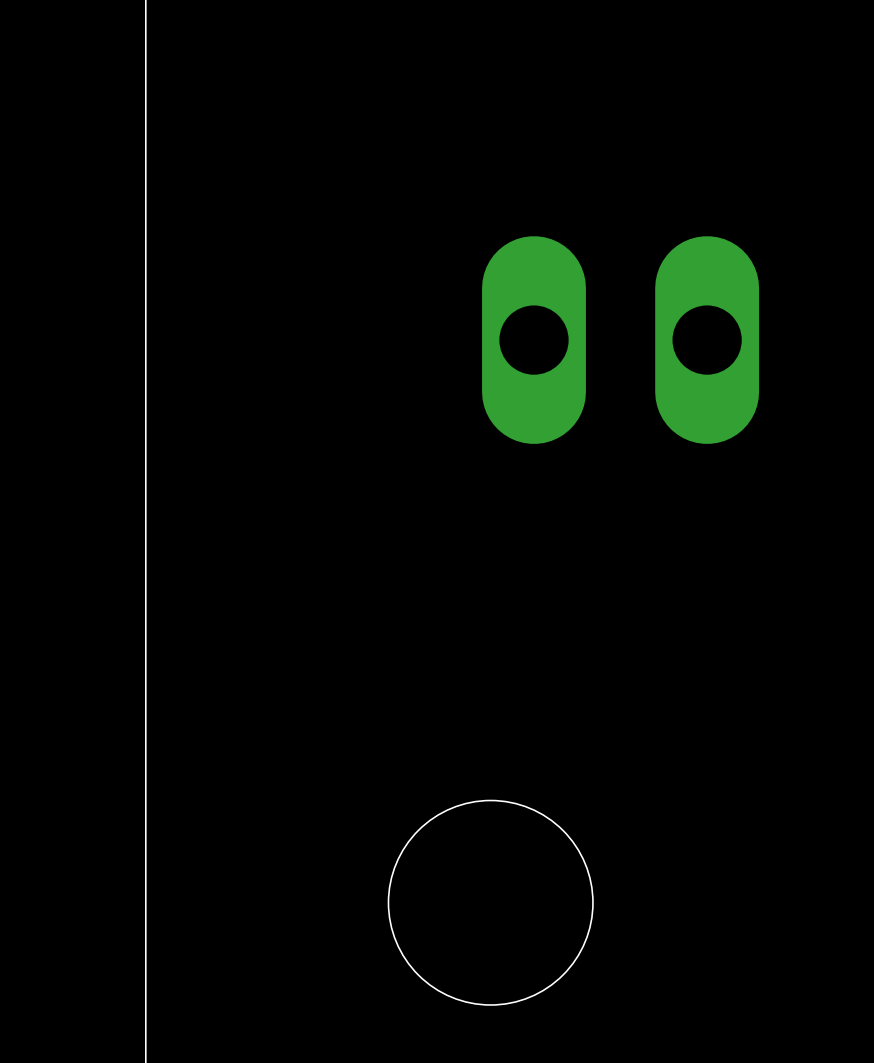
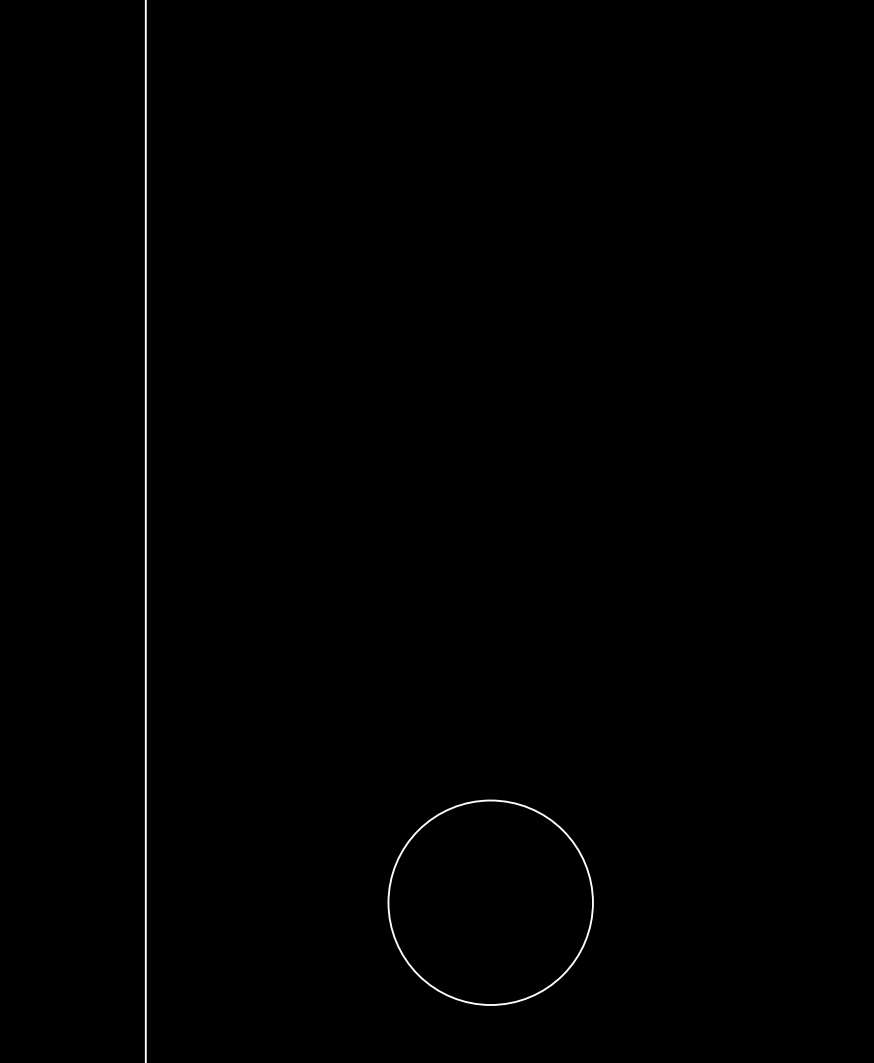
part: (620, 340) -> none

